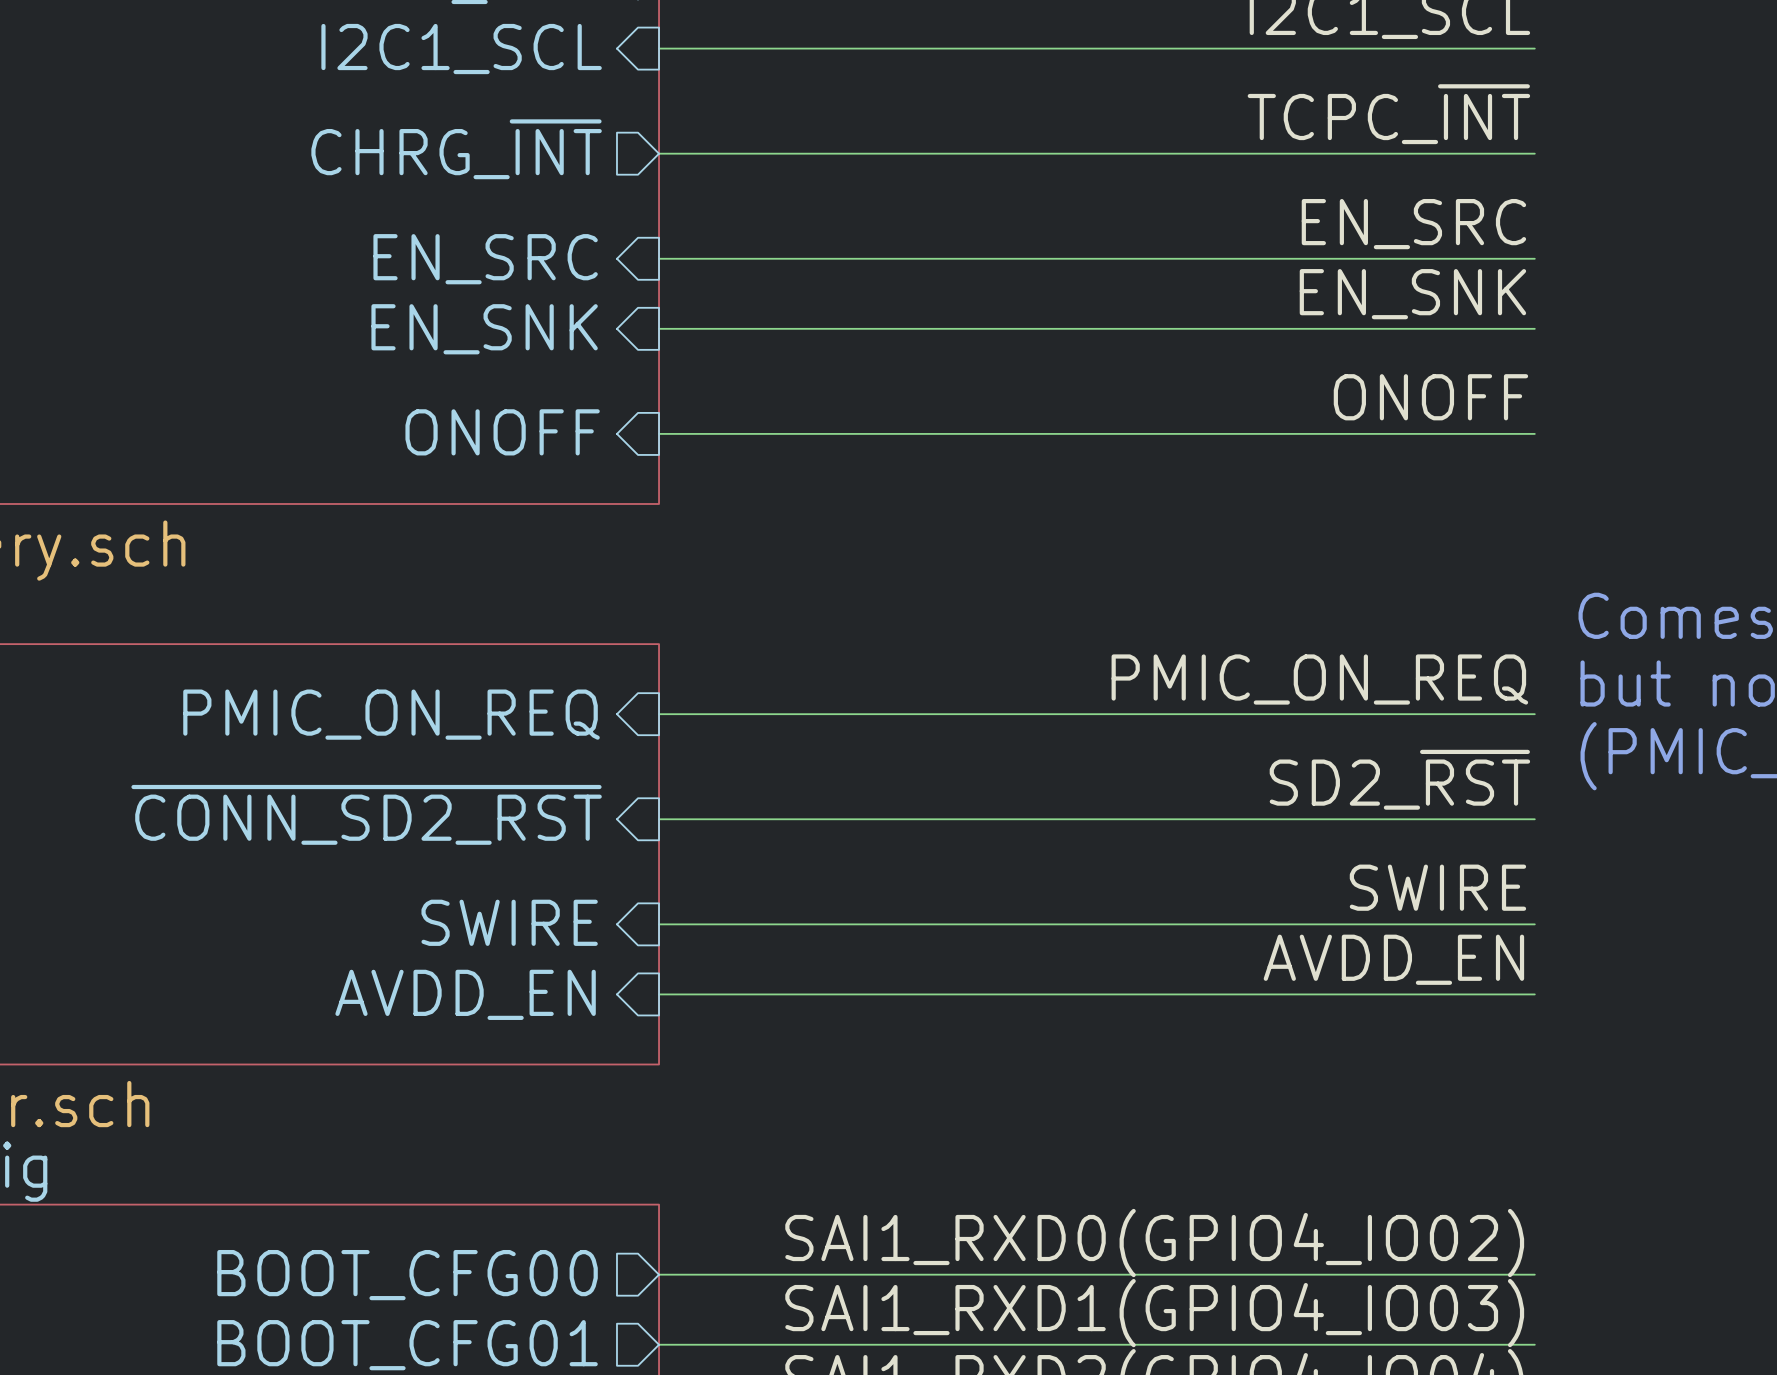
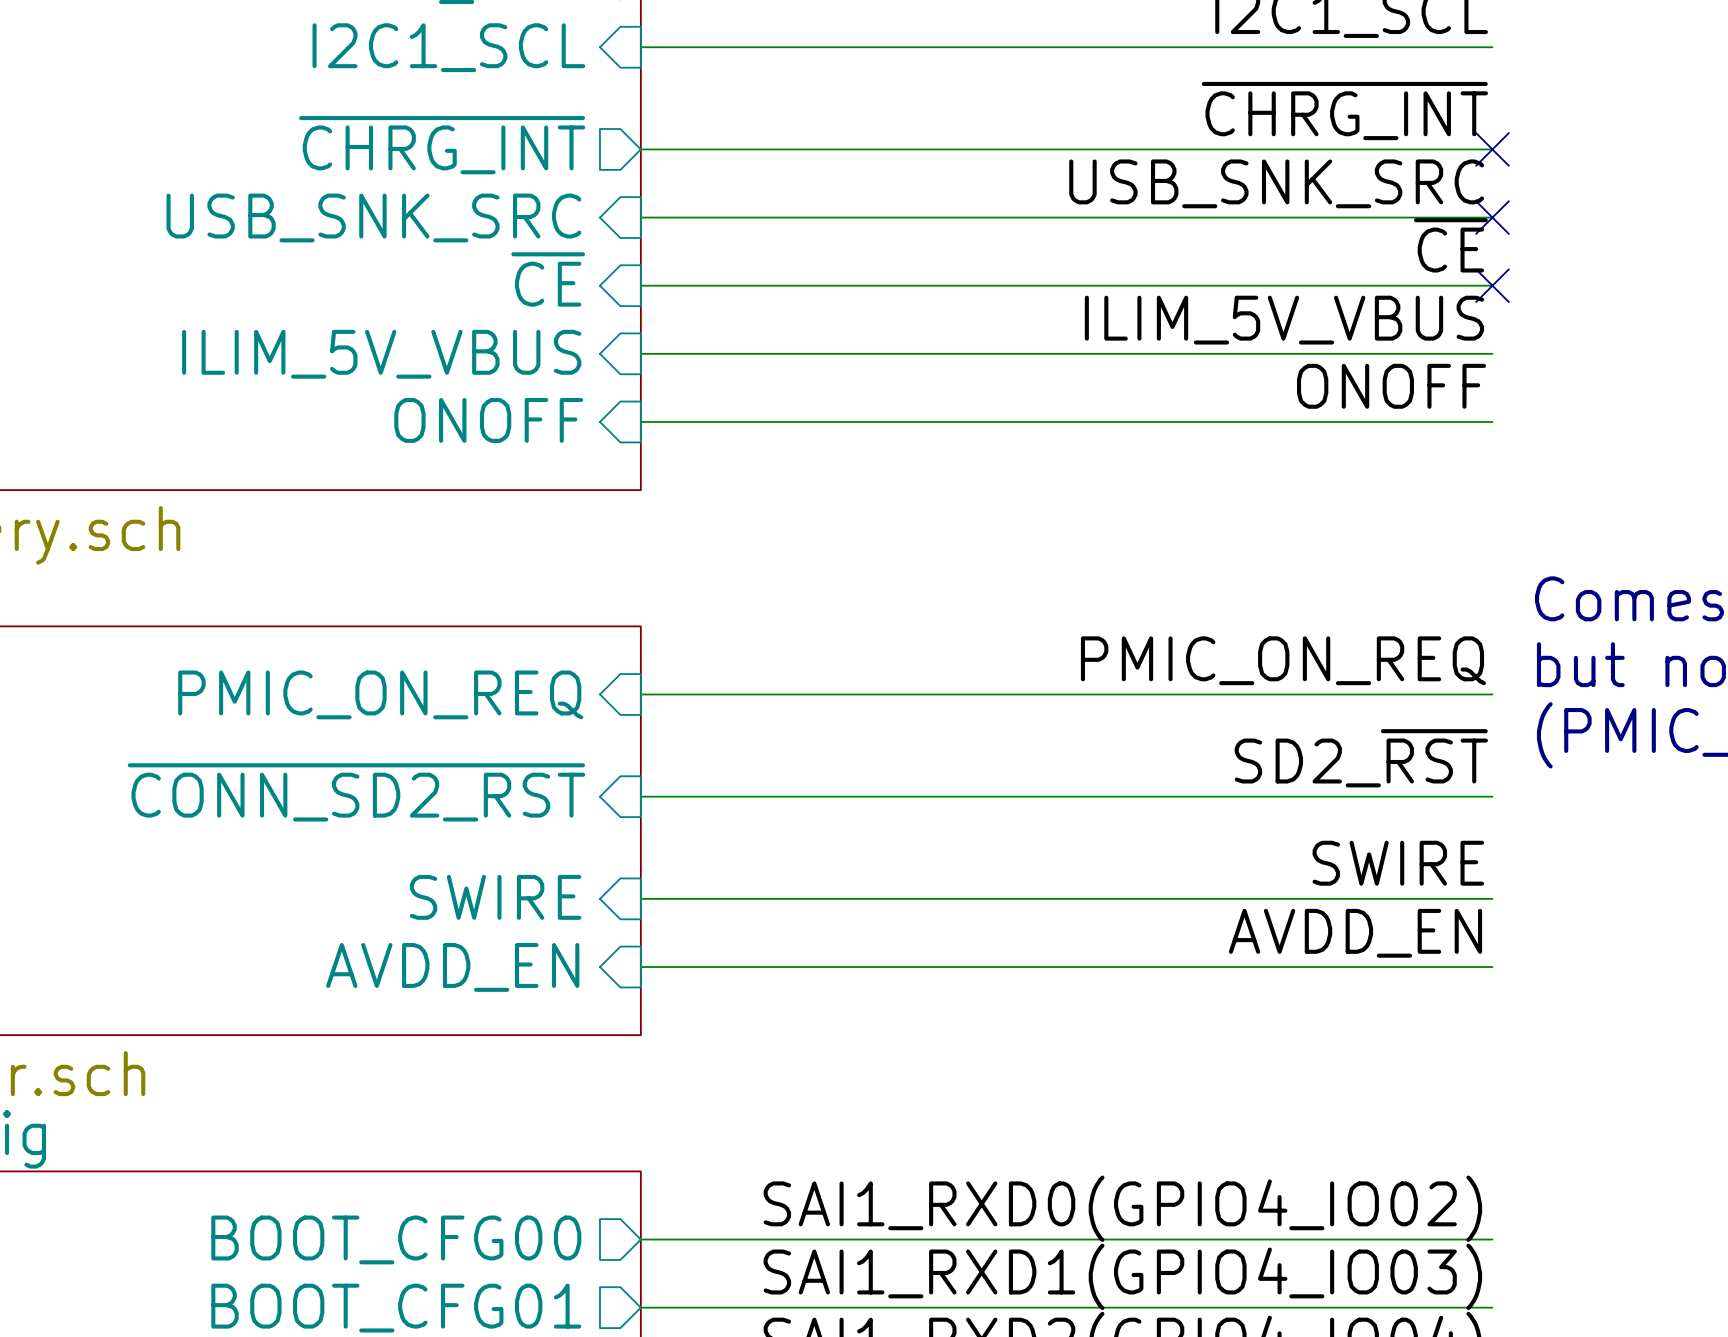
label: TCPC_~{INT} (1388, 114) -> ~{CHRG_INT} (1344, 111)
sheet pin: CHRG_~{INT} (456, 149) -> ~{CHRG_INT} (442, 145)
no-connect mark: none -> (1492, 149)
label: none -> USB_SNK_SRC (1276, 183)
no-connect mark: none -> (1492, 217)
sheet pin: none -> USB_SNK_SRC (373, 217)
label: EN_SRC (1413, 224) -> none
label: none -> ~{CE} (1450, 245)
wire: (659, 258) (1534, 258) -> (640, 217) (1492, 217)
sheet pin: EN_SRC (485, 259) -> none
sheet pin: none -> ~{CE} (548, 279)
no-connect mark: none -> (1492, 285)
label: EN_SNK (1412, 294) -> none
wire: (659, 328) (1534, 328) -> (640, 285) (1492, 285)
sheet pin: EN_SNK (484, 329) -> none
label: none -> ILIM_5V_VBUS (1284, 320)
wire: none -> (640, 353) (1492, 353)
sheet pin: none -> ILIM_5V_VBUS (381, 354)

